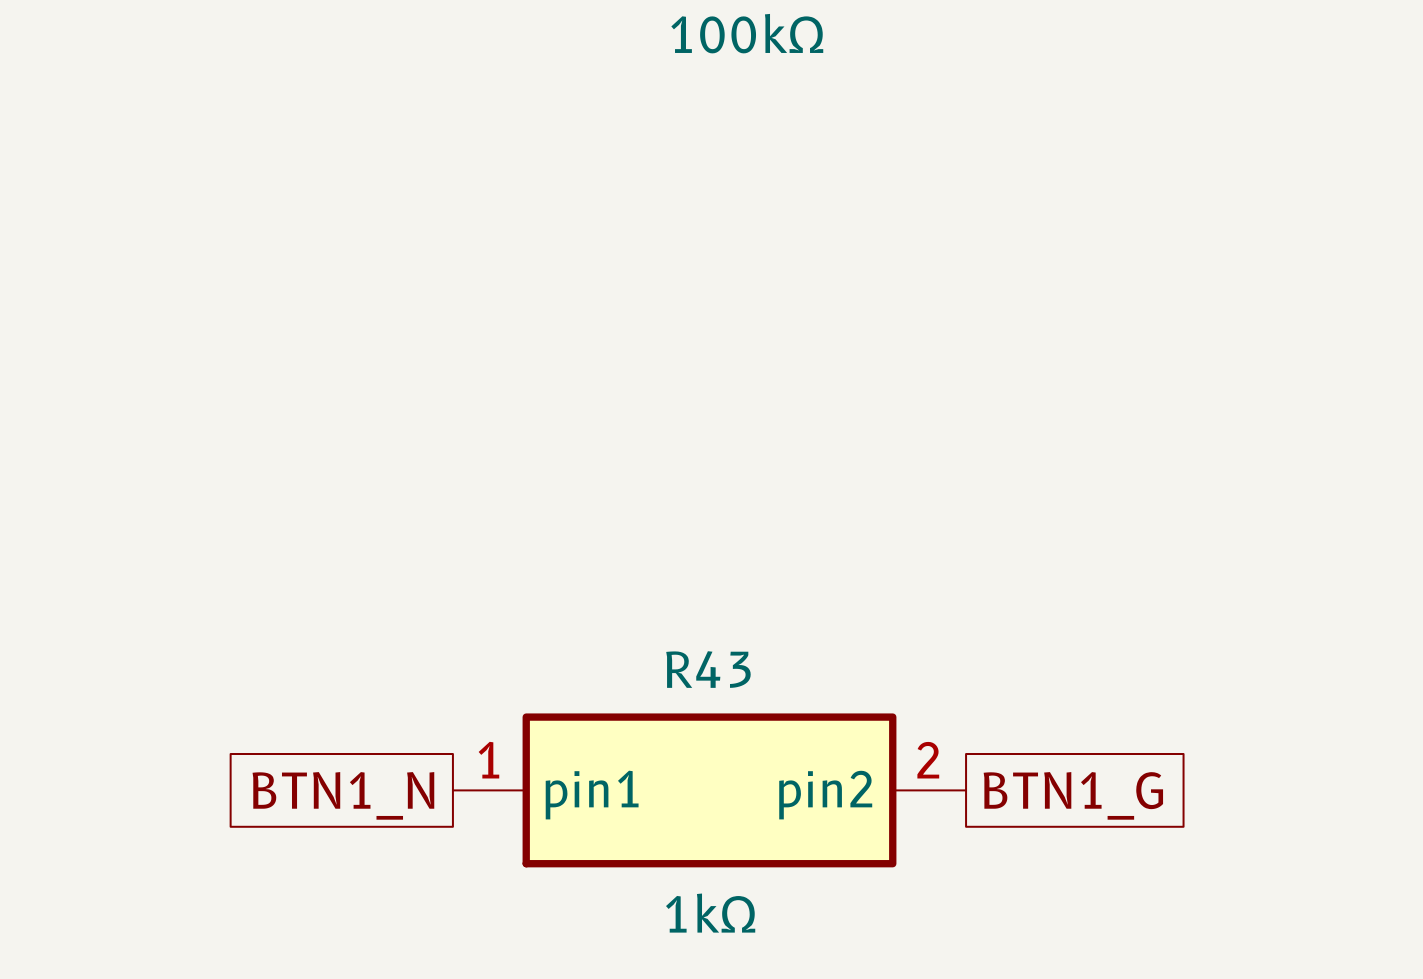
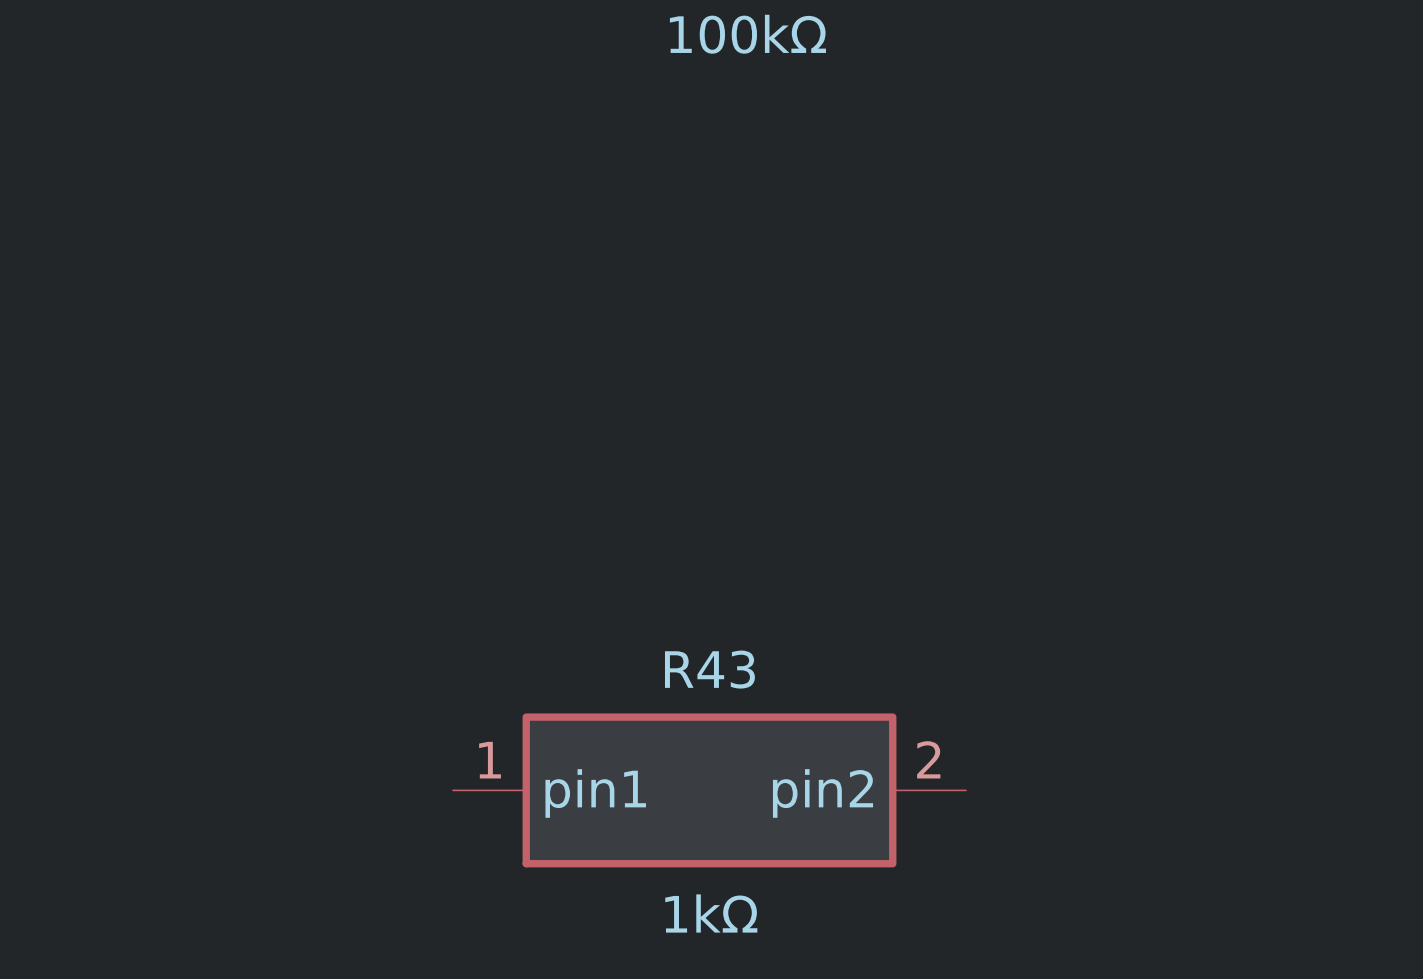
global label: BTN1_N (343, 795) -> none
global label: BTN1_G (1073, 795) -> none

